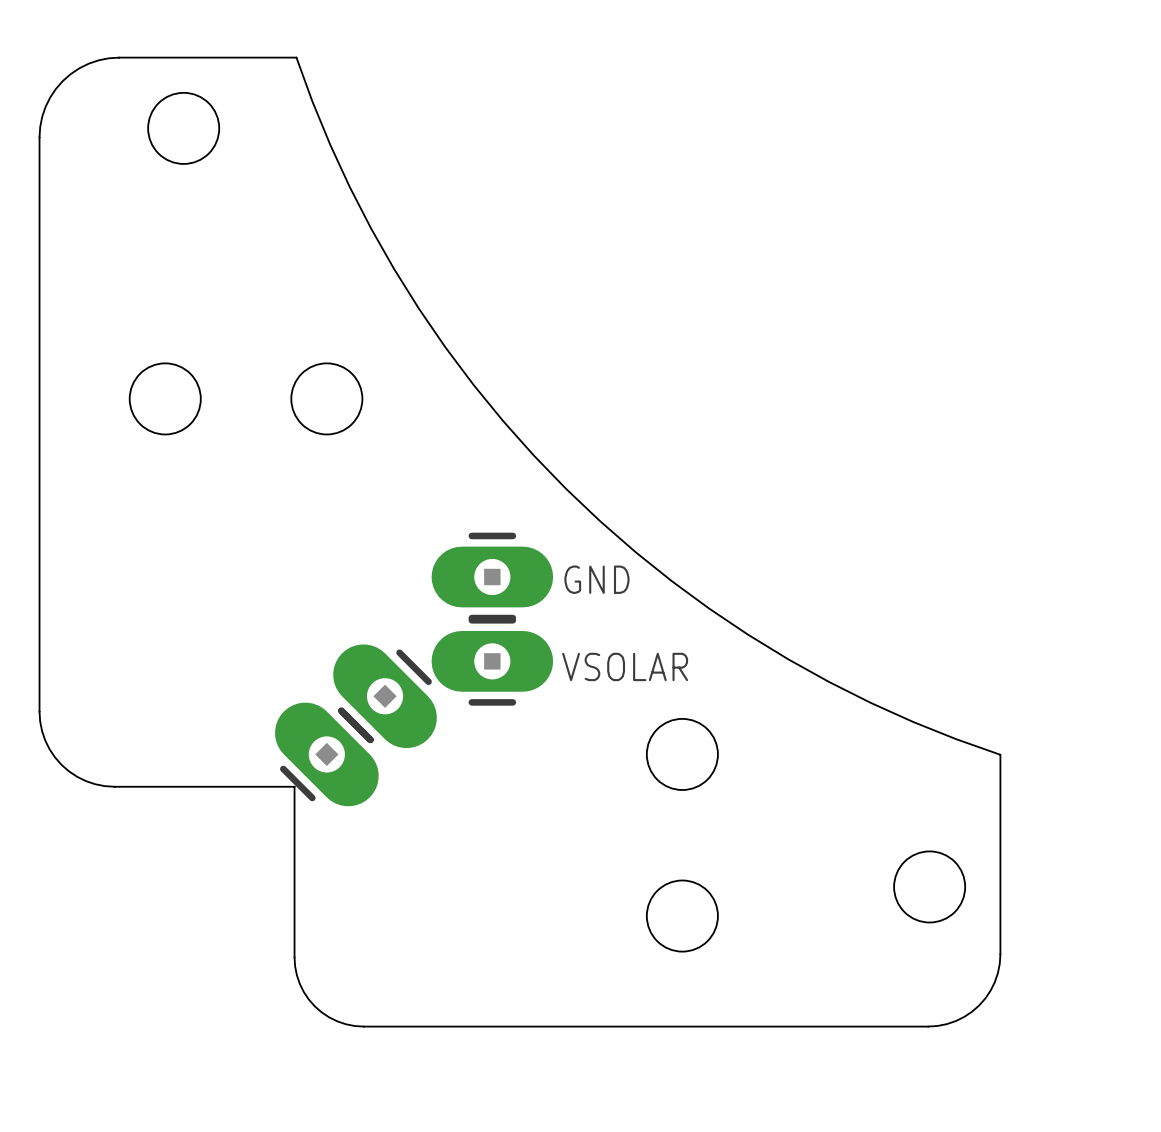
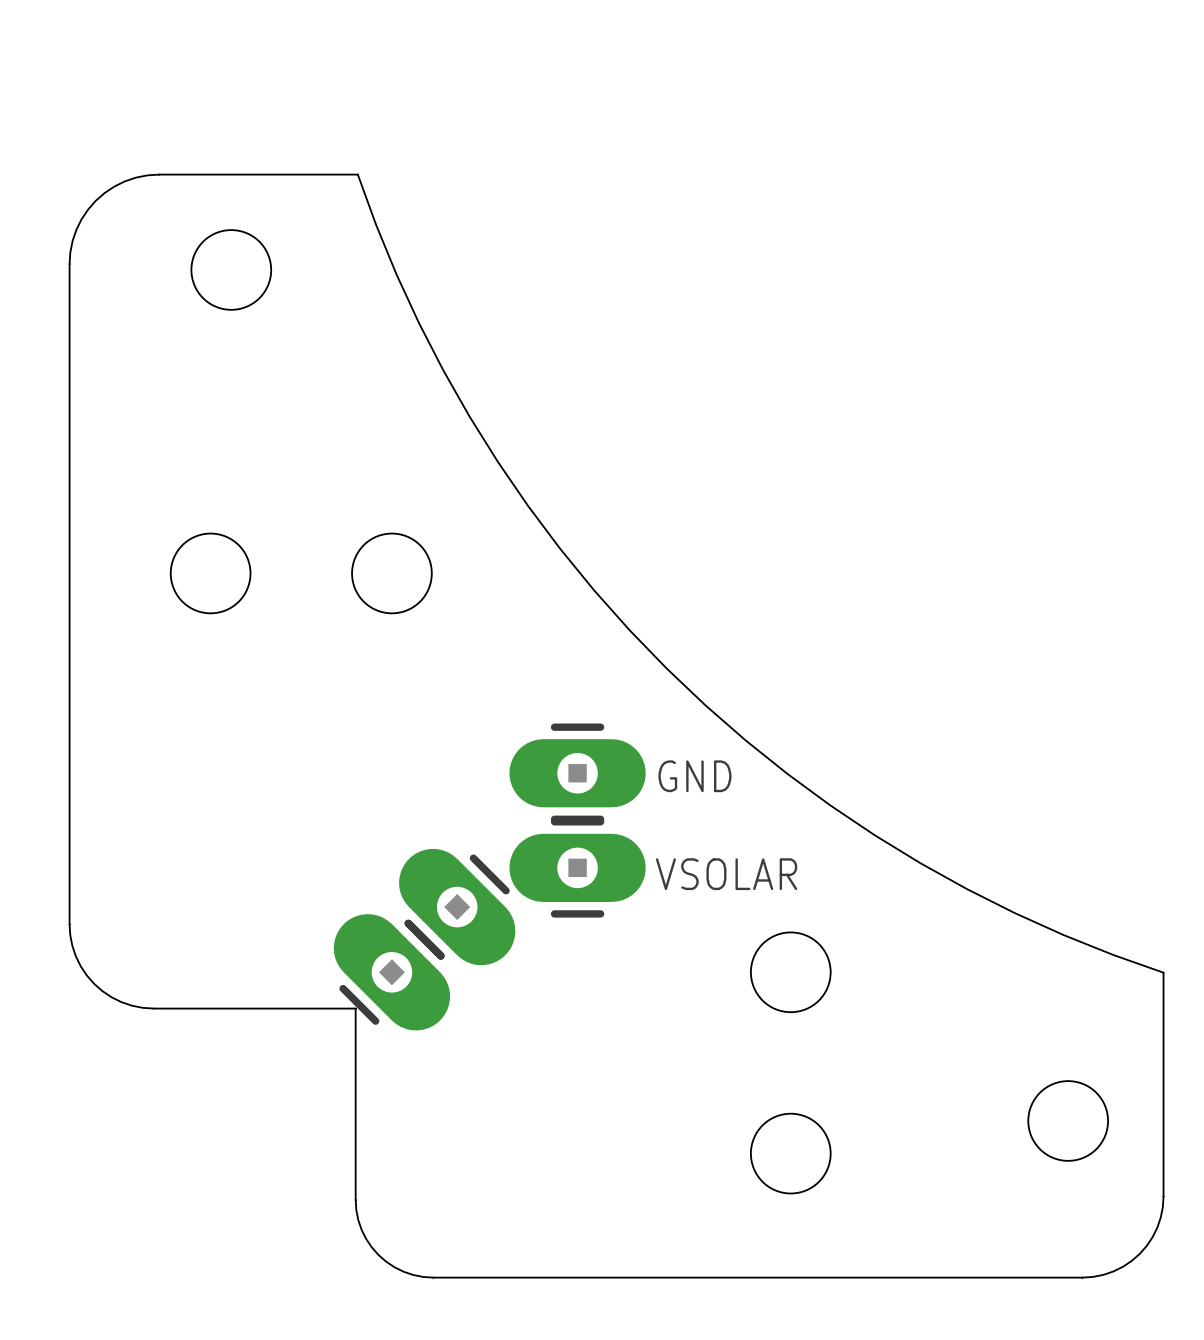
board edge: (39, 137) (42, 116) (56, 88) (70, 74) (98, 60) (119, 57) (296, 57) (330, 144) (371, 228) (394, 269) (445, 347) (473, 384) (502, 420) (566, 489) (635, 551) (709, 608) (748, 634) (828, 681) (870, 702) (913, 721) (1000, 754) (1000, 954) (997, 973) (990, 990) (972, 1011) (946, 1024) (928, 1026) -> (69, 280) (70, 252) (72, 240) (81, 219) (88, 209) (104, 193) (124, 181) (135, 177) (159, 174) (357, 174) (396, 274) (443, 370) (469, 416) (528, 506) (560, 548) (629, 630) (666, 668) (745, 740) (787, 773) (874, 835) (967, 889) (1014, 913) (1063, 935) (1163, 972) (1163, 1196) (1160, 1217) (1146, 1245) (1123, 1266) (1093, 1276) (1066, 1277)

